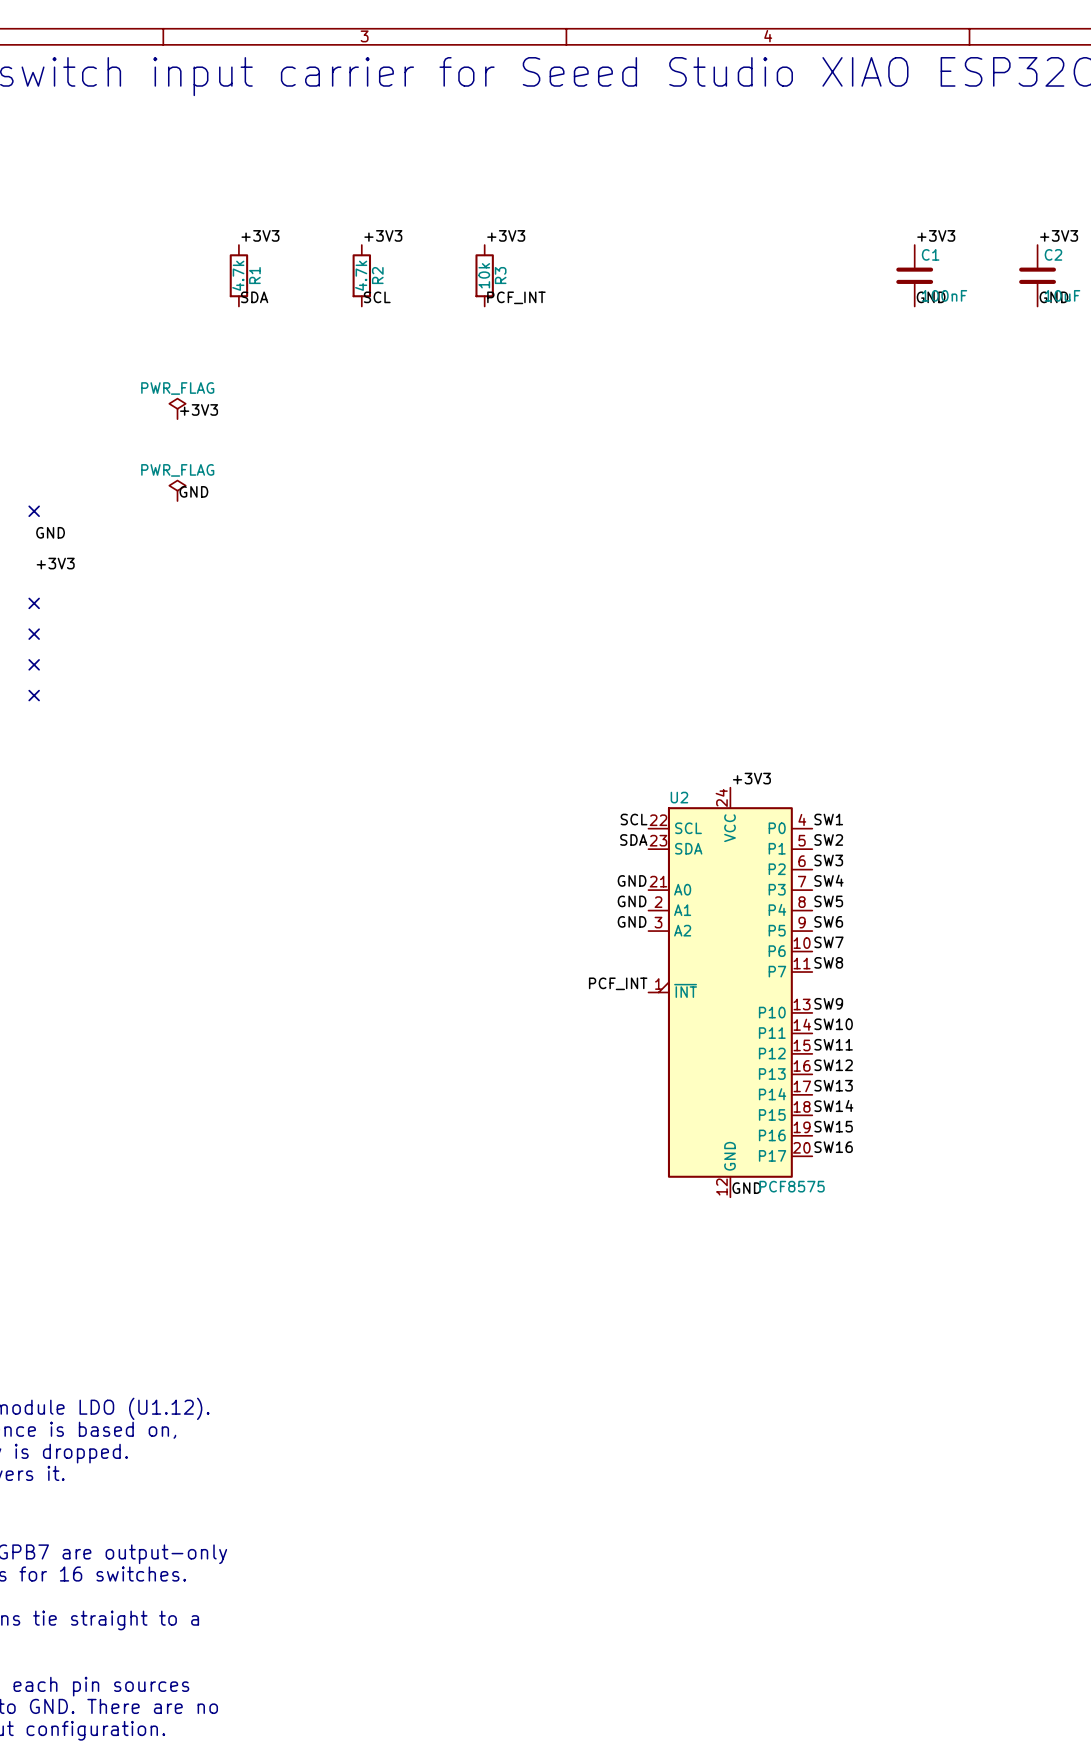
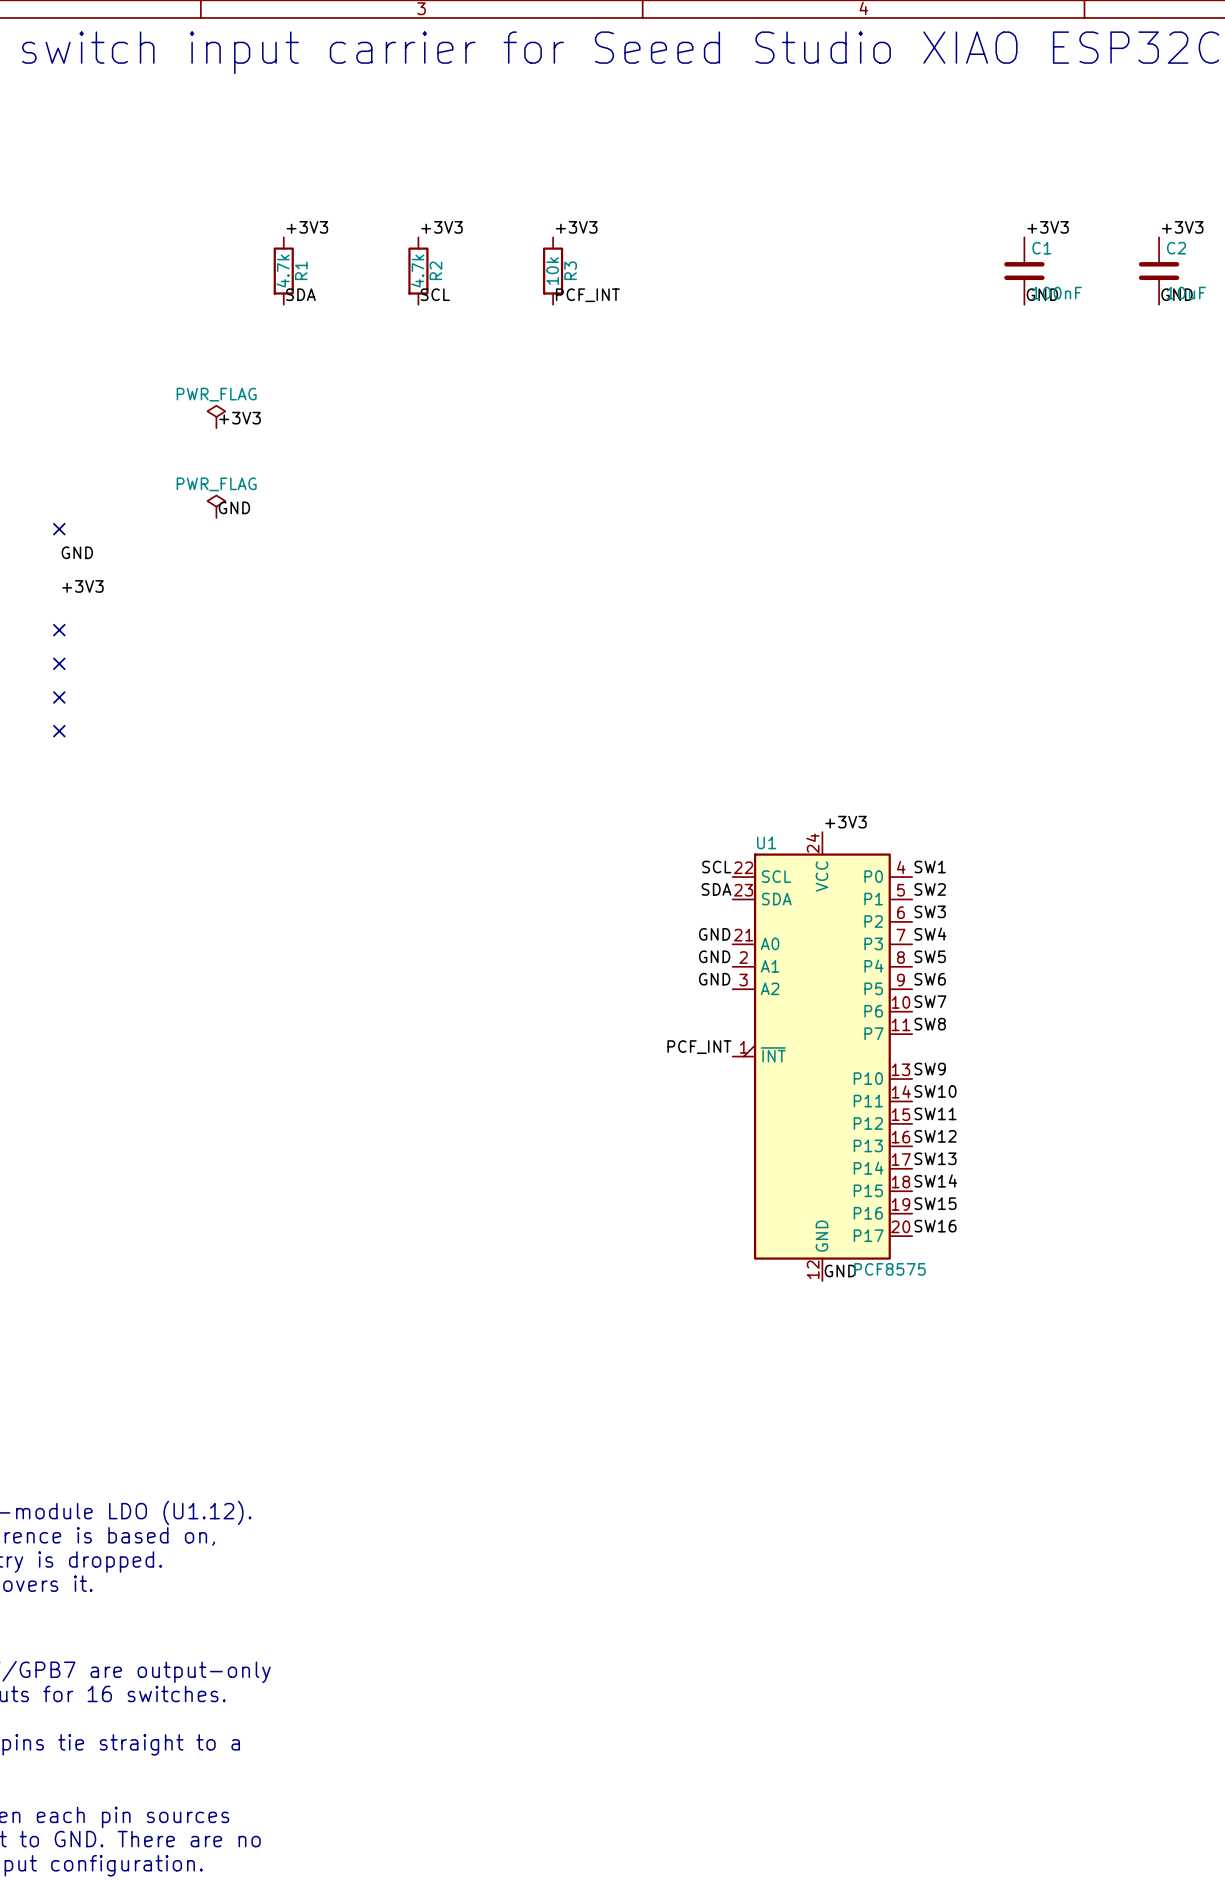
U2 name: U2 (679, 797) -> U1 (766, 842)

